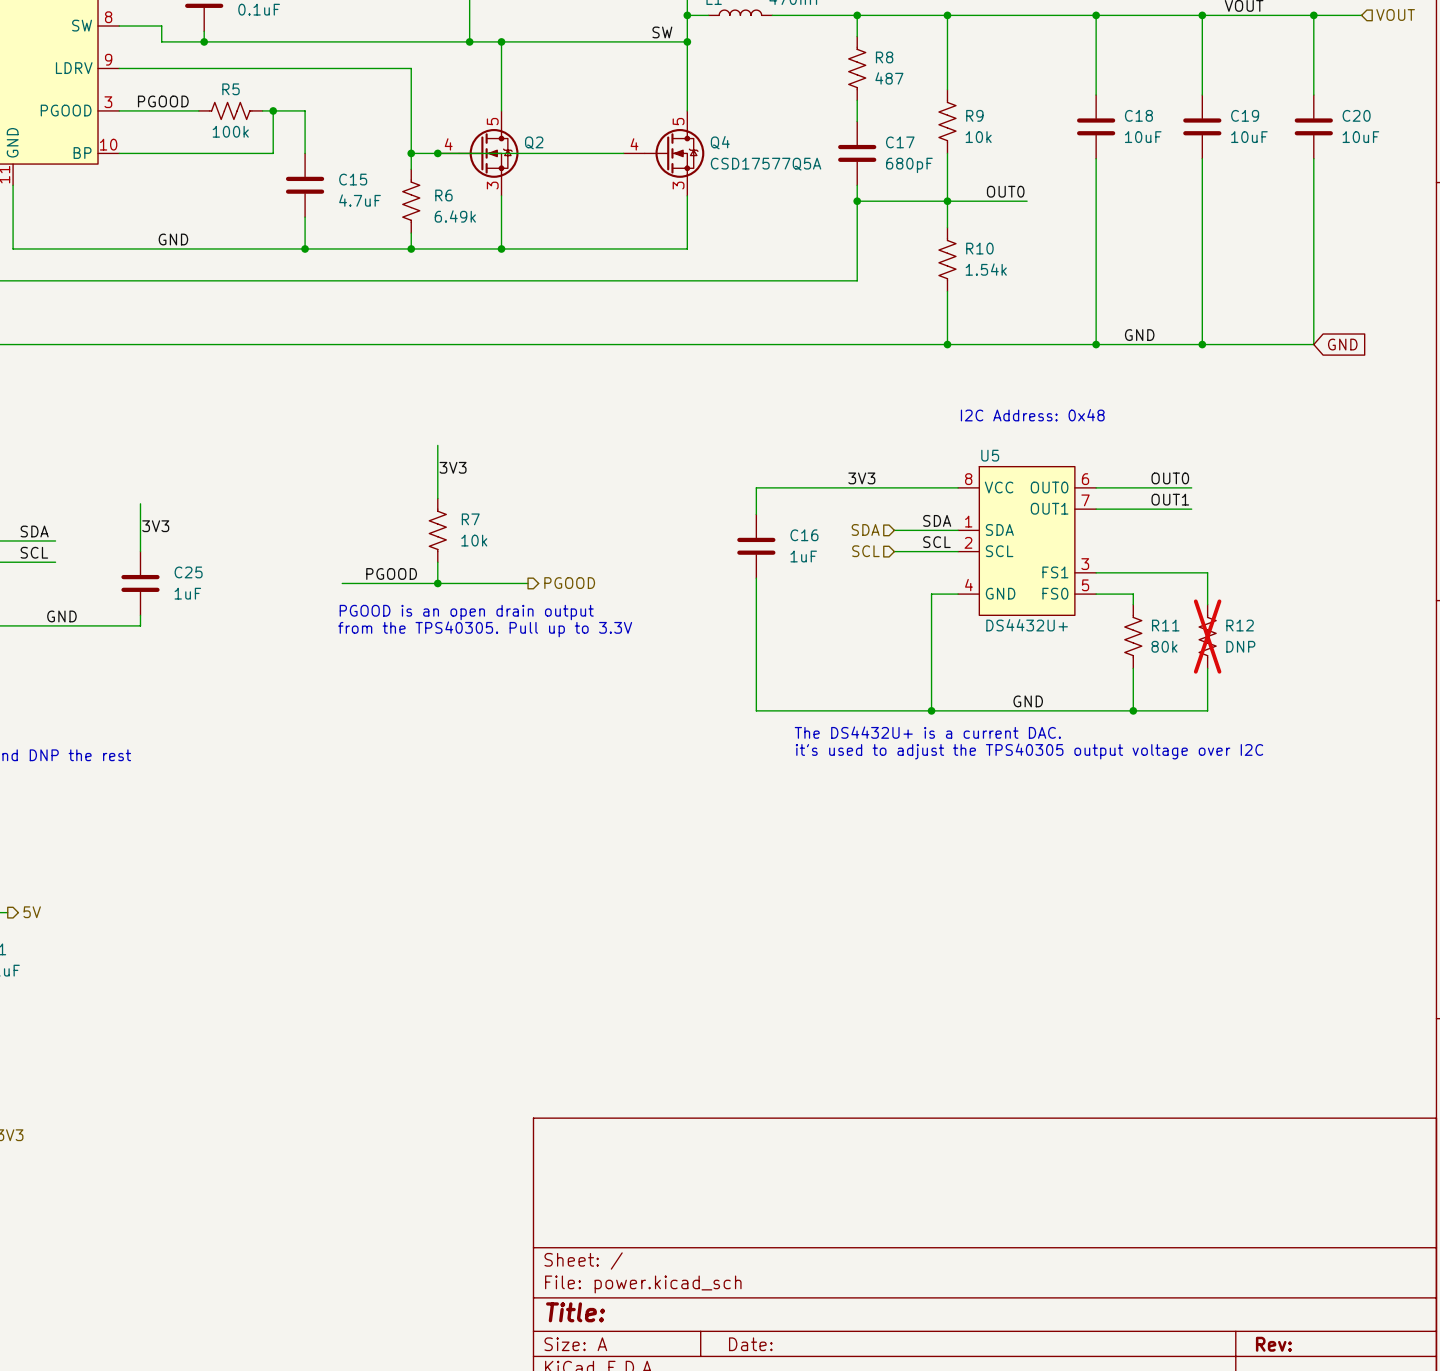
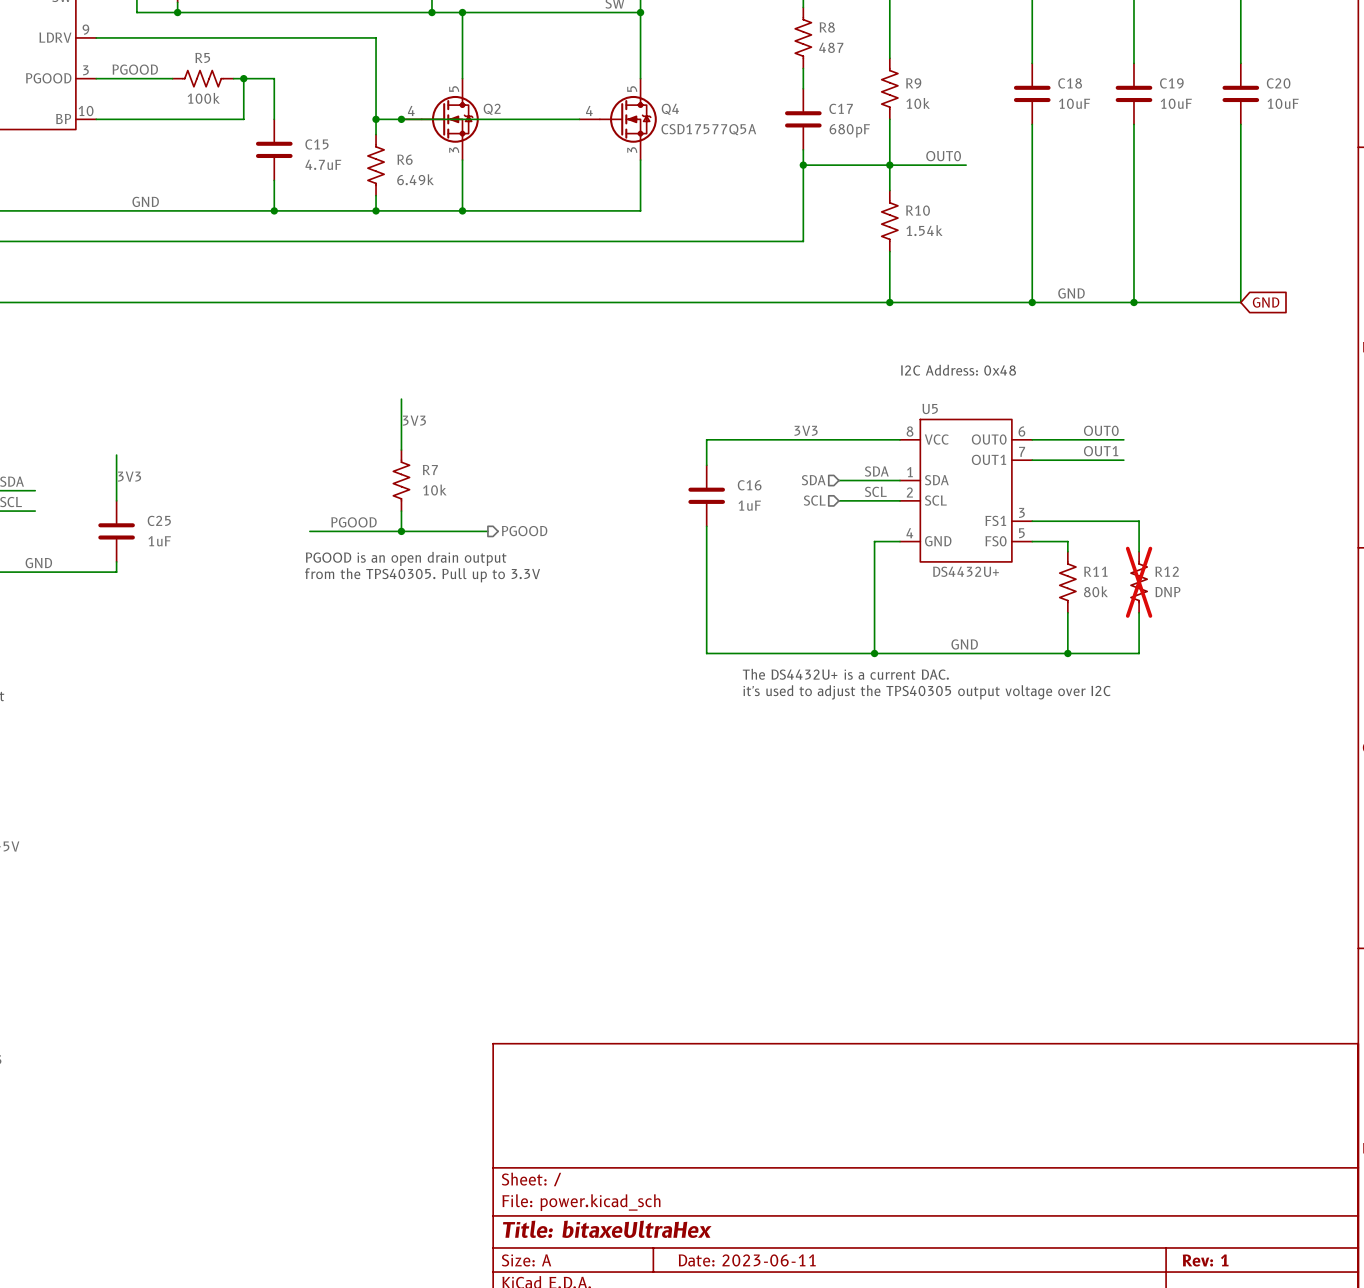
title block: Title: (575, 1312) -> Title: bitaxeUltraHex (607, 1229)
title block: Date: (750, 1344) -> Date: 2023-06-11 (747, 1260)
title block: Rev: (1273, 1344) -> Rev: 1 (1205, 1260)

